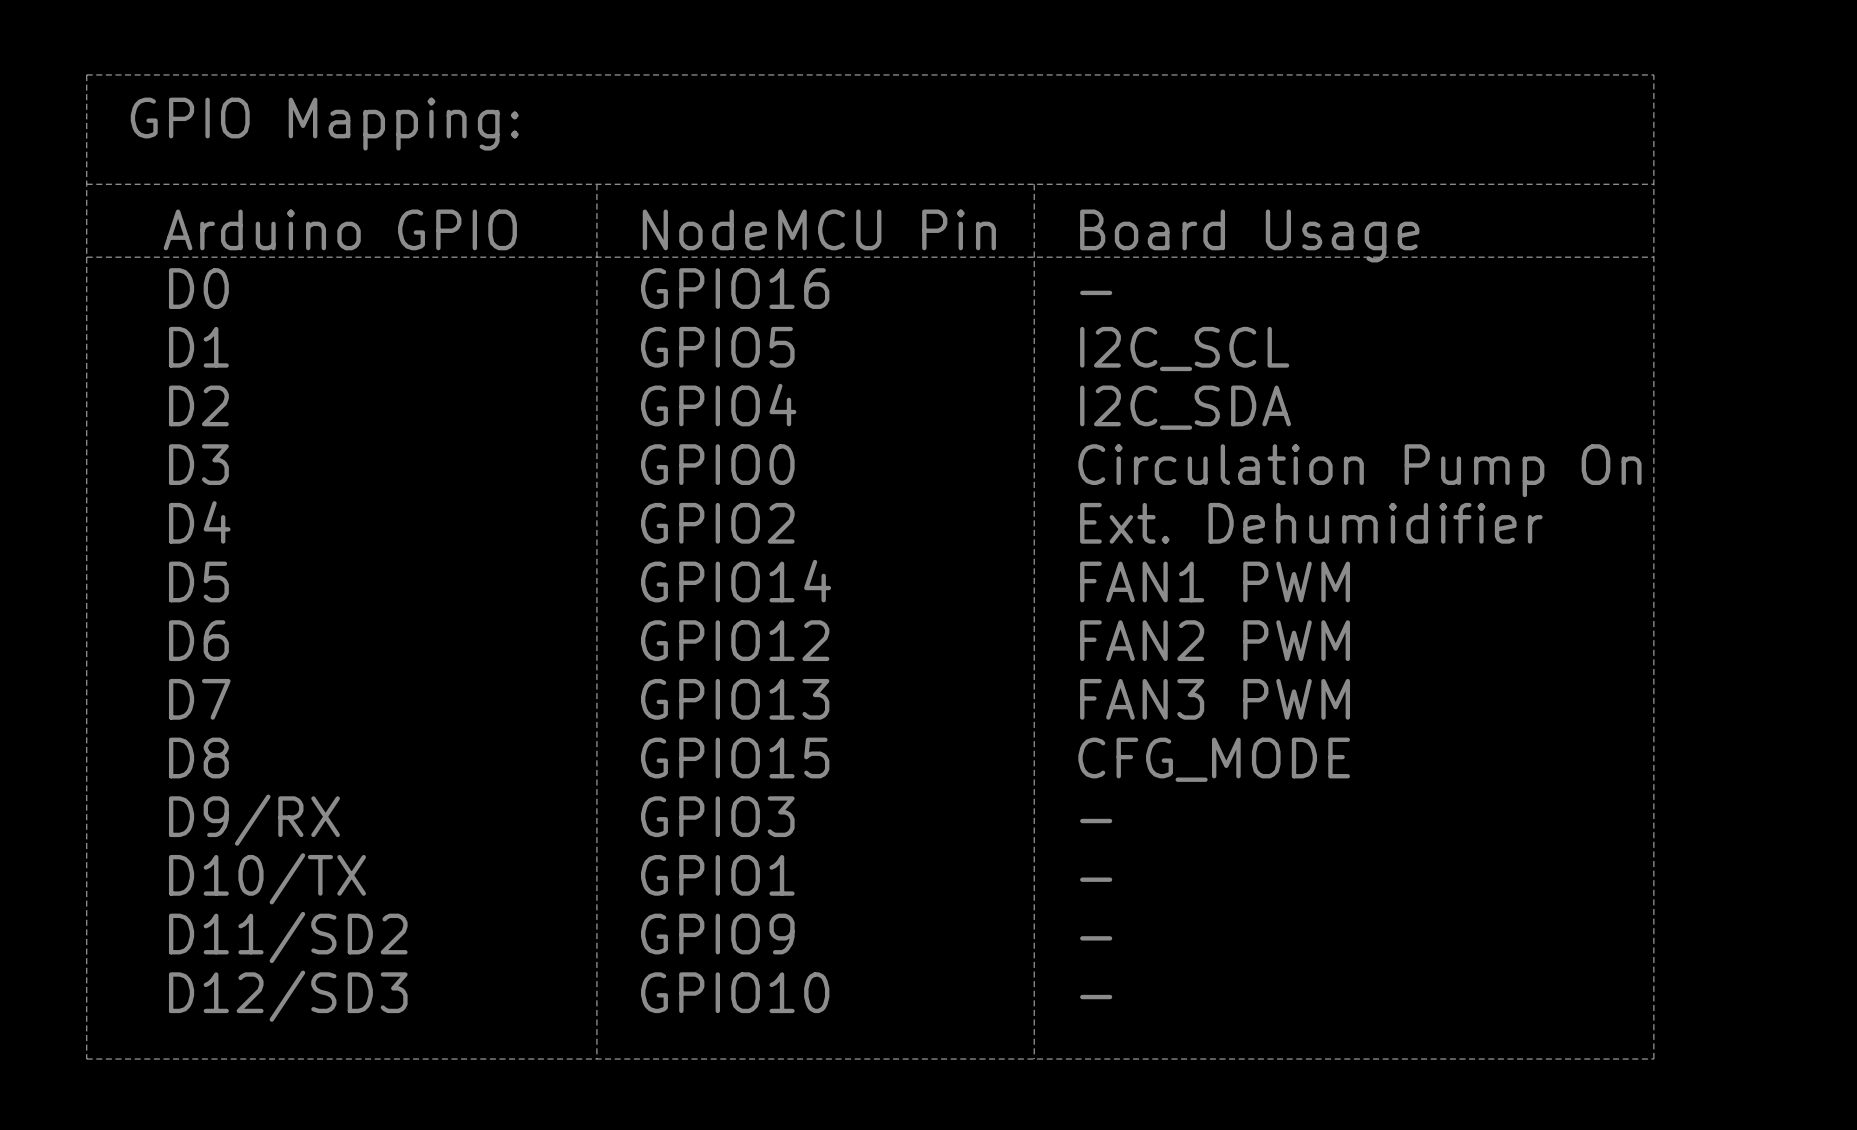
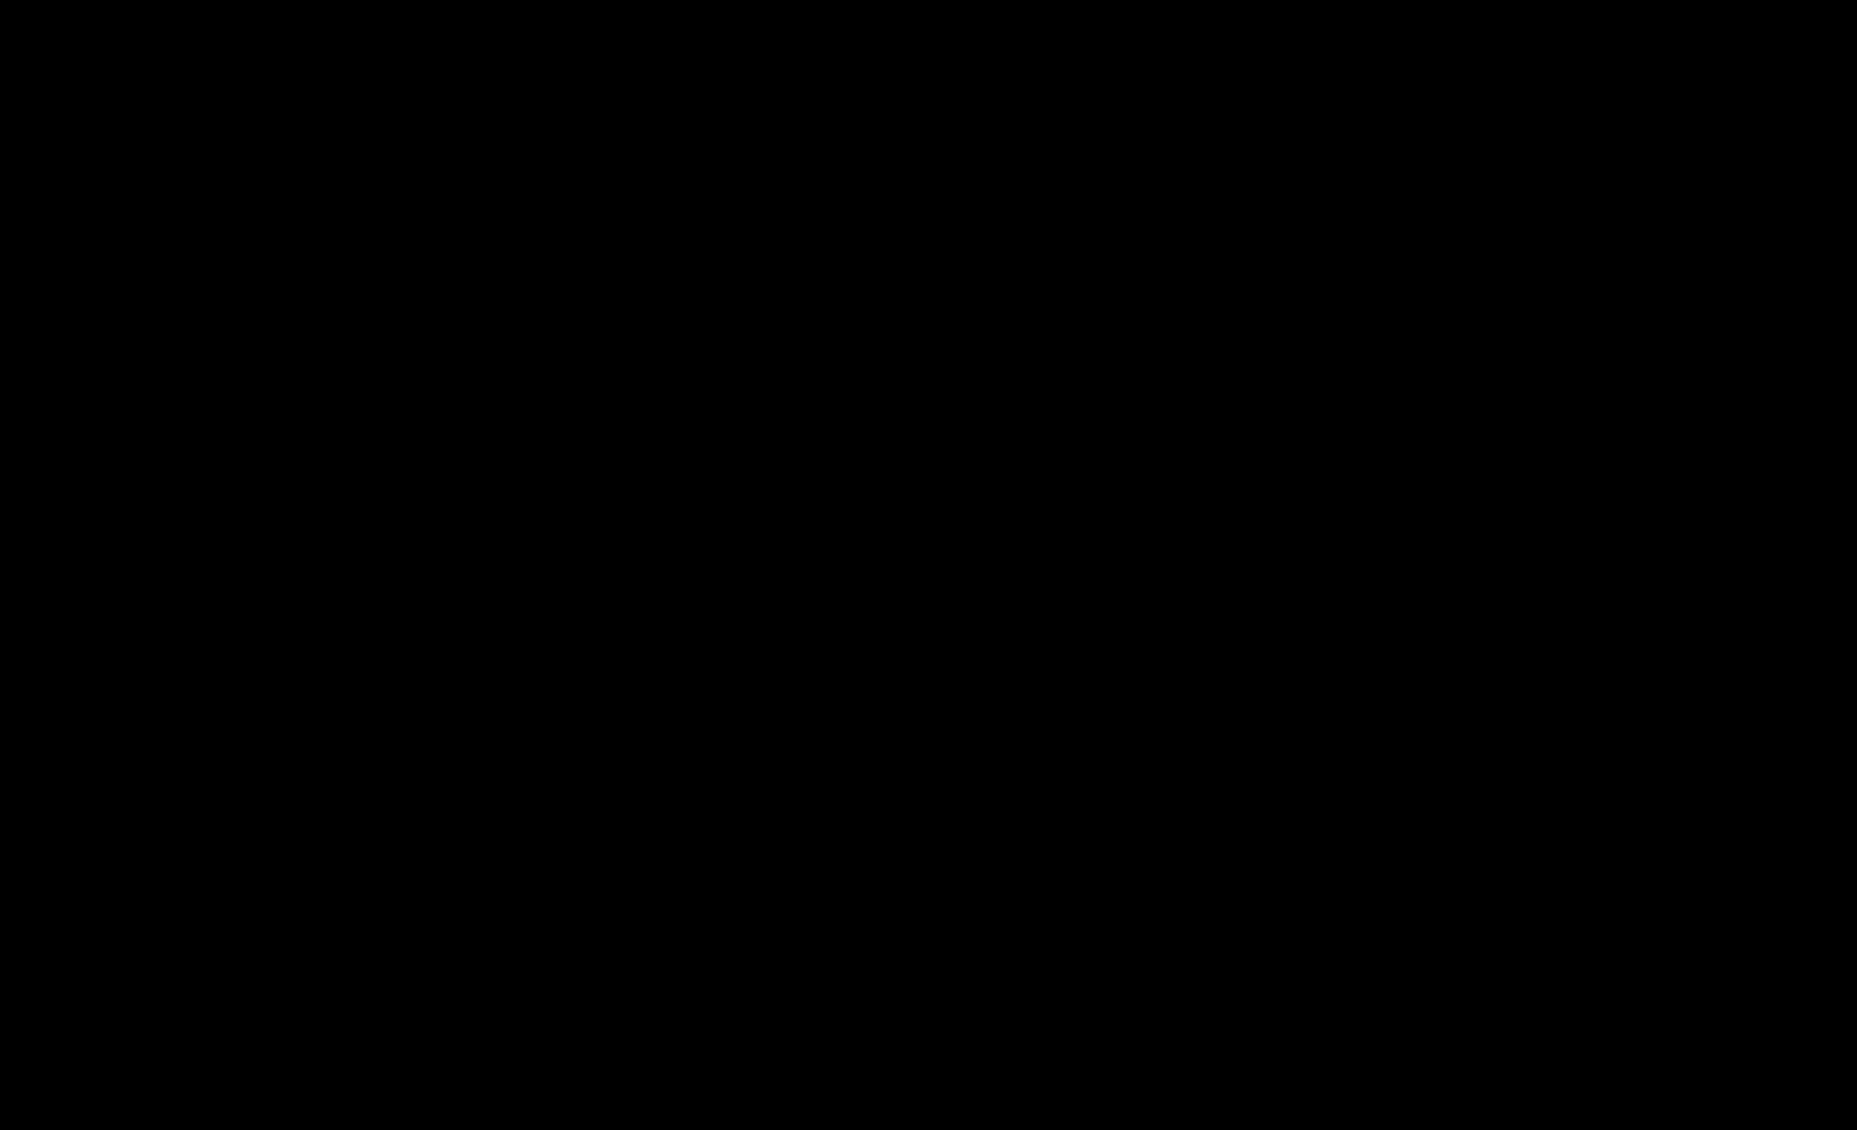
line: (86, 74) (1653, 74) (1653, 1059) (86, 1059) (86, 74) -> none
text: GPIO Mapping: (324, 124) -> none
line: (86, 184) (1653, 184) -> none
line: (596, 184) (596, 1059) -> none
line: (1034, 184) (1034, 1059) -> none
text: Arduino GPIO (340, 229) -> none
text: NodeMCU Pin (819, 229) -> none
text: Board Usage (1249, 235) -> none
line: (86, 257) (1653, 257) -> none
text: D0 (198, 288) -> none
text: GPIO16 (735, 288) -> none
text: - (1096, 292) -> none
text: D1 (198, 347) -> none
text: GPIO5 (717, 347) -> none
text: I2C_SCL (1184, 348) -> none
text: D2 (198, 405) -> none
text: GPIO4 (718, 405) -> none
text: I2C_SDA (1185, 407) -> none
text: D3 (198, 464) -> none
text: GPIO0 (717, 464) -> none
text: Circulation Pump On (1359, 470) -> none
text: D4 (199, 522) -> none
text: GPIO2 (717, 523) -> none
text: Ext. Dehumidifier (1311, 523) -> none
text: D5 (198, 581) -> none
text: GPIO14 (736, 581) -> none
text: FAN1 PWM (1215, 581) -> none
text: D6 (198, 640) -> none
text: GPIO12 (735, 640) -> none
text: FAN2 PWM (1215, 640) -> none
text: D7 (199, 699) -> none
text: GPIO13 (735, 699) -> none
text: FAN3 PWM (1215, 699) -> none
text: D8 (198, 758) -> none
text: GPIO15 (735, 758) -> none
text: CFG_MODE (1214, 759) -> none
text: GPIO3 (717, 816) -> none
text: D9/RX (254, 820) -> none
text: - (1096, 821) -> none
text: GPIO1 (717, 875) -> none
text: D10/TX (267, 878) -> none
text: - (1096, 879) -> none
text: GPIO9 (717, 934) -> none
text: D11/SD2 (288, 937) -> none
text: - (1096, 938) -> none
text: GPIO10 (735, 992) -> none
text: D12/SD3 (288, 996) -> none
text: - (1096, 997) -> none

